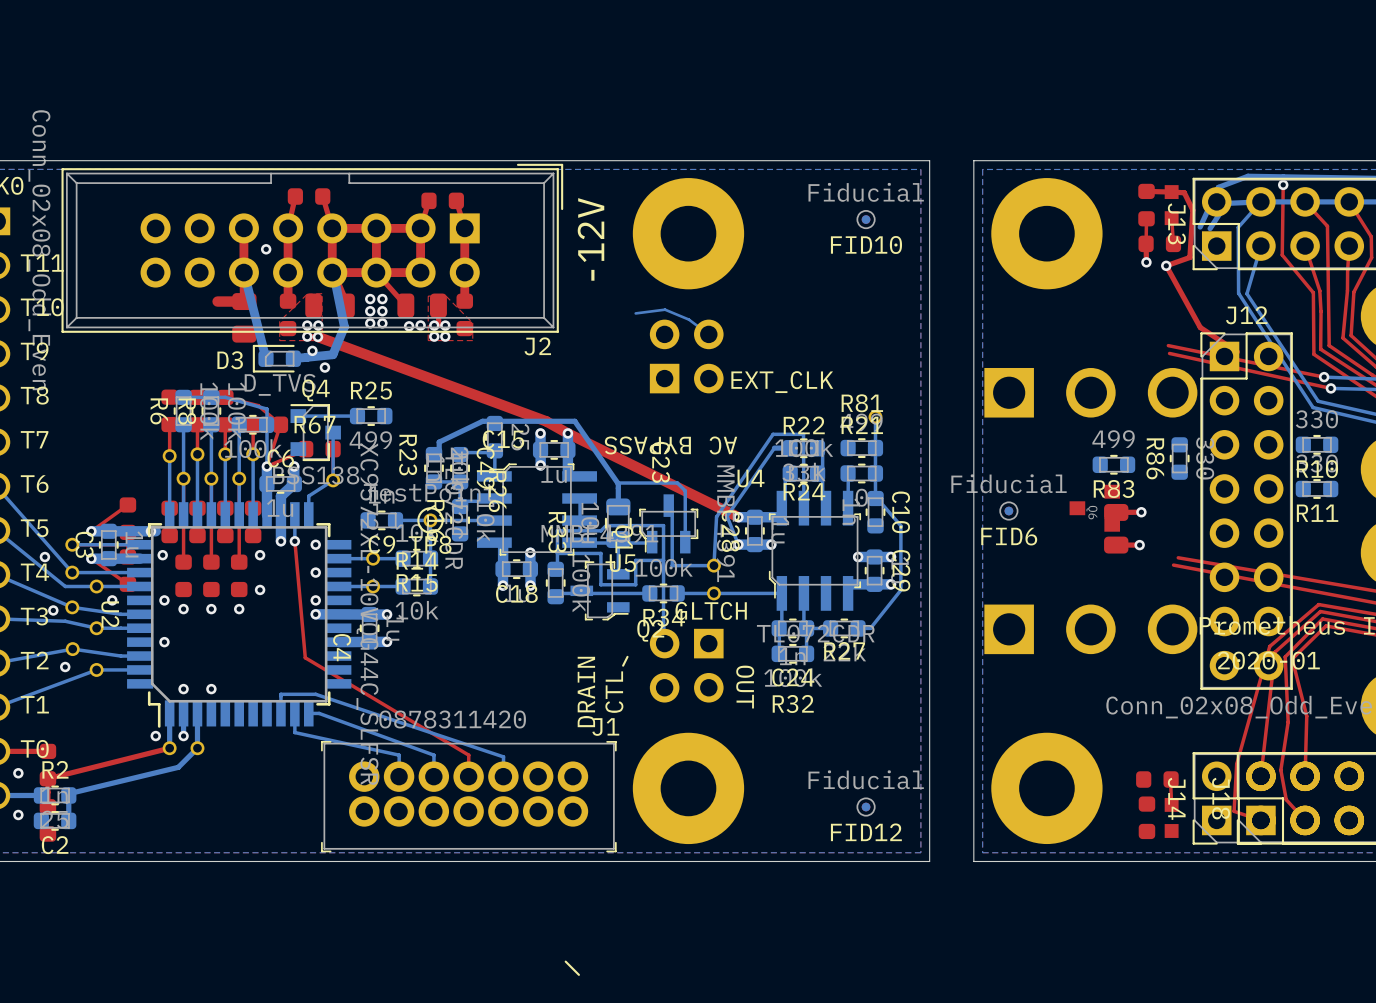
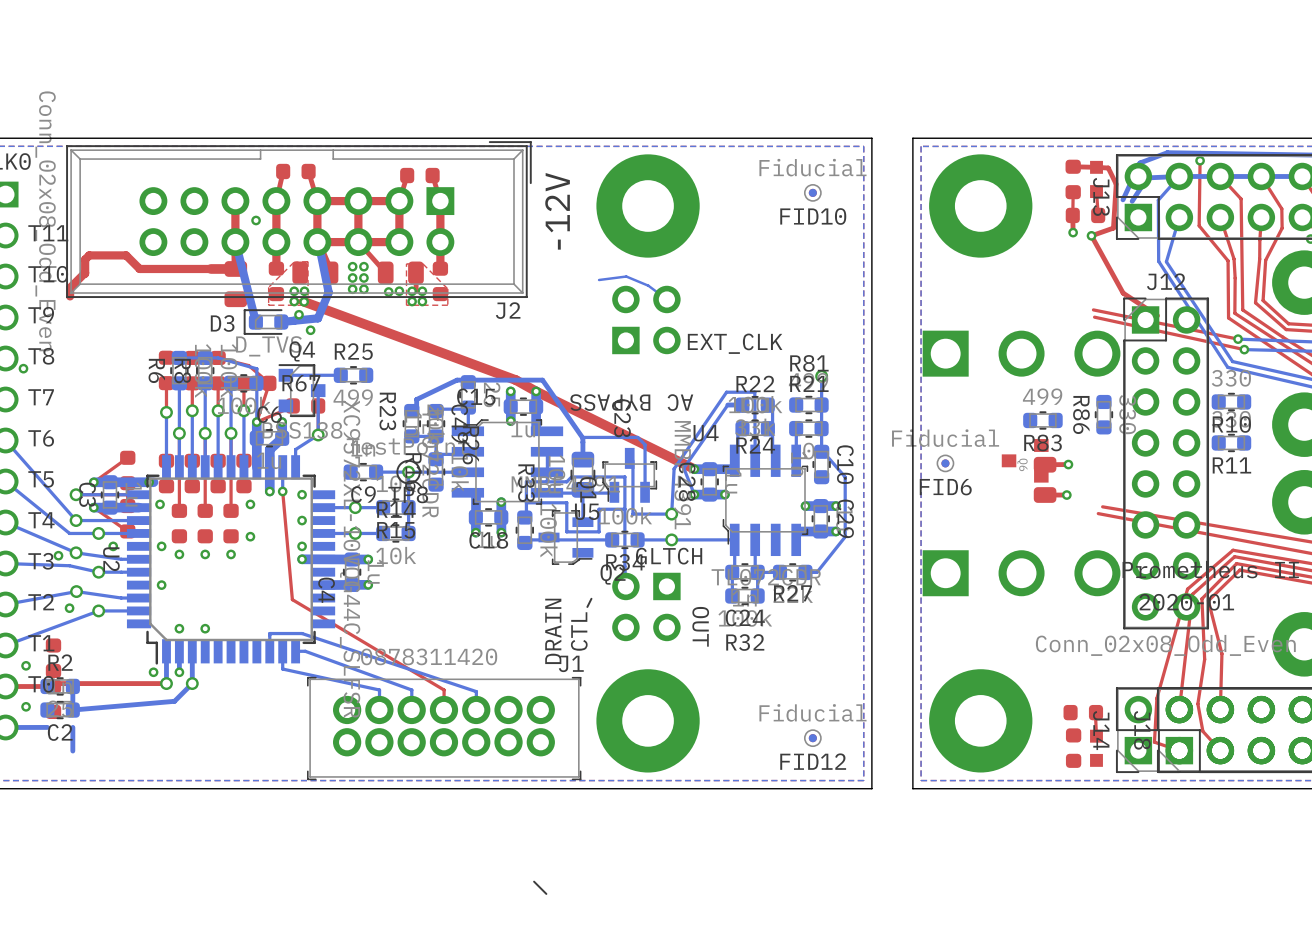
top track: none -> (210, 268) (139, 268) (126, 255) (89, 255) (85, 259) (85, 273)
top track: none -> (85, 272) (70, 287) (70, 296)
via: none -> (23, 368)
via: (44, 557) -> none
part: none -> (53, 658)
top track: (169, 748) (47, 778) (47, 806) -> (166, 683) (53, 683)
bottom track: (178, 767) (68, 793) -> (174, 701) (72, 710) (72, 686)
R2 position: (55, 795) -> (60, 686)
via position: (18, 814) -> (26, 665)
part: (47, 820) -> none
C2 position: (55, 820) -> (60, 710)

